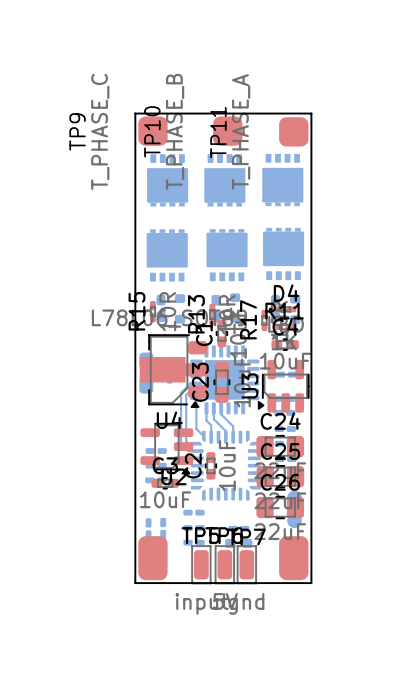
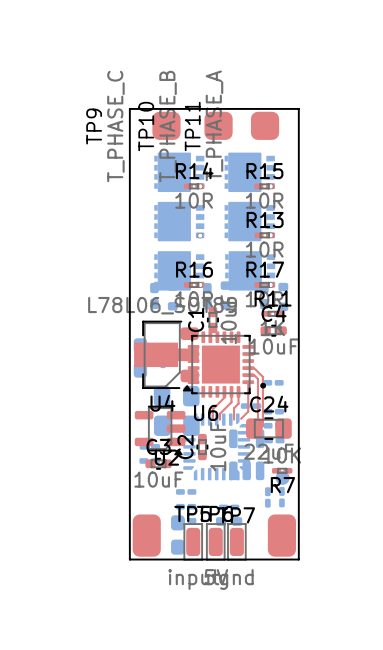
TP9 position: (152, 131) -> (166, 125)
TP11 position: (293, 131) -> (265, 125)
part: none -> (179, 172)
part: none -> (249, 172)
part: (167, 180) -> none
part: (224, 180) -> none
part: (282, 180) -> none
via: none -> (200, 186)
via: none -> (270, 186)
part: none -> (179, 221)
part: none -> (249, 221)
via: none -> (200, 235)
via: none -> (270, 235)
part: (283, 253) -> none
part: (167, 255) -> none
part: (227, 255) -> none
part: none -> (179, 270)
part: none -> (250, 270)
via: none -> (200, 284)
via: none -> (270, 284)
D4 side: top (282, 309) -> bottom (251, 406)
R15 rotation: 0° (152, 311) -> 90° clockwise (264, 186)
R15 position: (152, 311) -> (264, 186)
R13 rotation: 0° (212, 314) -> 90° clockwise (264, 235)
R13 position: (212, 314) -> (264, 235)
R17 rotation: 0° (264, 320) -> 90° clockwise (264, 284)
R17 position: (264, 320) -> (264, 284)
R14 side: bottom (286, 374) -> top (194, 186)
U6 side: bottom (224, 379) -> top (226, 364)
C23 side: top (221, 382) -> bottom (177, 534)
bottom track: (196, 383) (190, 383) (181, 392) (181, 443) (188, 451) (197, 451) -> none
top track: none -> (248, 368) (254, 368) (262, 376) (262, 425) (255, 432) (247, 432)
U3 side: top (283, 386) -> bottom (246, 454)
bottom track: (196, 390) (190, 390) (186, 394) (186, 441) (188, 443) (196, 443) -> none
top track: none -> (248, 375) (254, 375) (257, 379) (257, 423) (255, 425) (248, 425)
bottom track: (196, 398) (196, 428) (203, 436) -> none
top track: none -> (248, 382) (248, 411) (241, 418)
bottom track: (206, 408) (206, 420) (211, 425) (211, 437) -> none
bottom track: (213, 408) (213, 419) (225, 431) (225, 437) -> none
bottom track: (221, 408) (221, 414) (233, 426) (233, 437) -> none
top track: none -> (224, 391) (224, 397) (212, 409) (212, 419)
top track: none -> (231, 391) (231, 402) (219, 413) (219, 419)
top track: none -> (238, 391) (238, 403) (234, 408) (234, 419)
R16 side: bottom (284, 412) -> top (194, 284)
R7 side: bottom (156, 451) -> top (282, 470)
C25 side: top (280, 476) -> bottom (176, 425)
C26 side: top (280, 507) -> bottom (176, 396)
part footprint: [287, 513, 302, 529] -> [279, 486, 285, 508]
part: none -> (267, 497)
part: (148, 528) -> none
part: (163, 528) -> none

